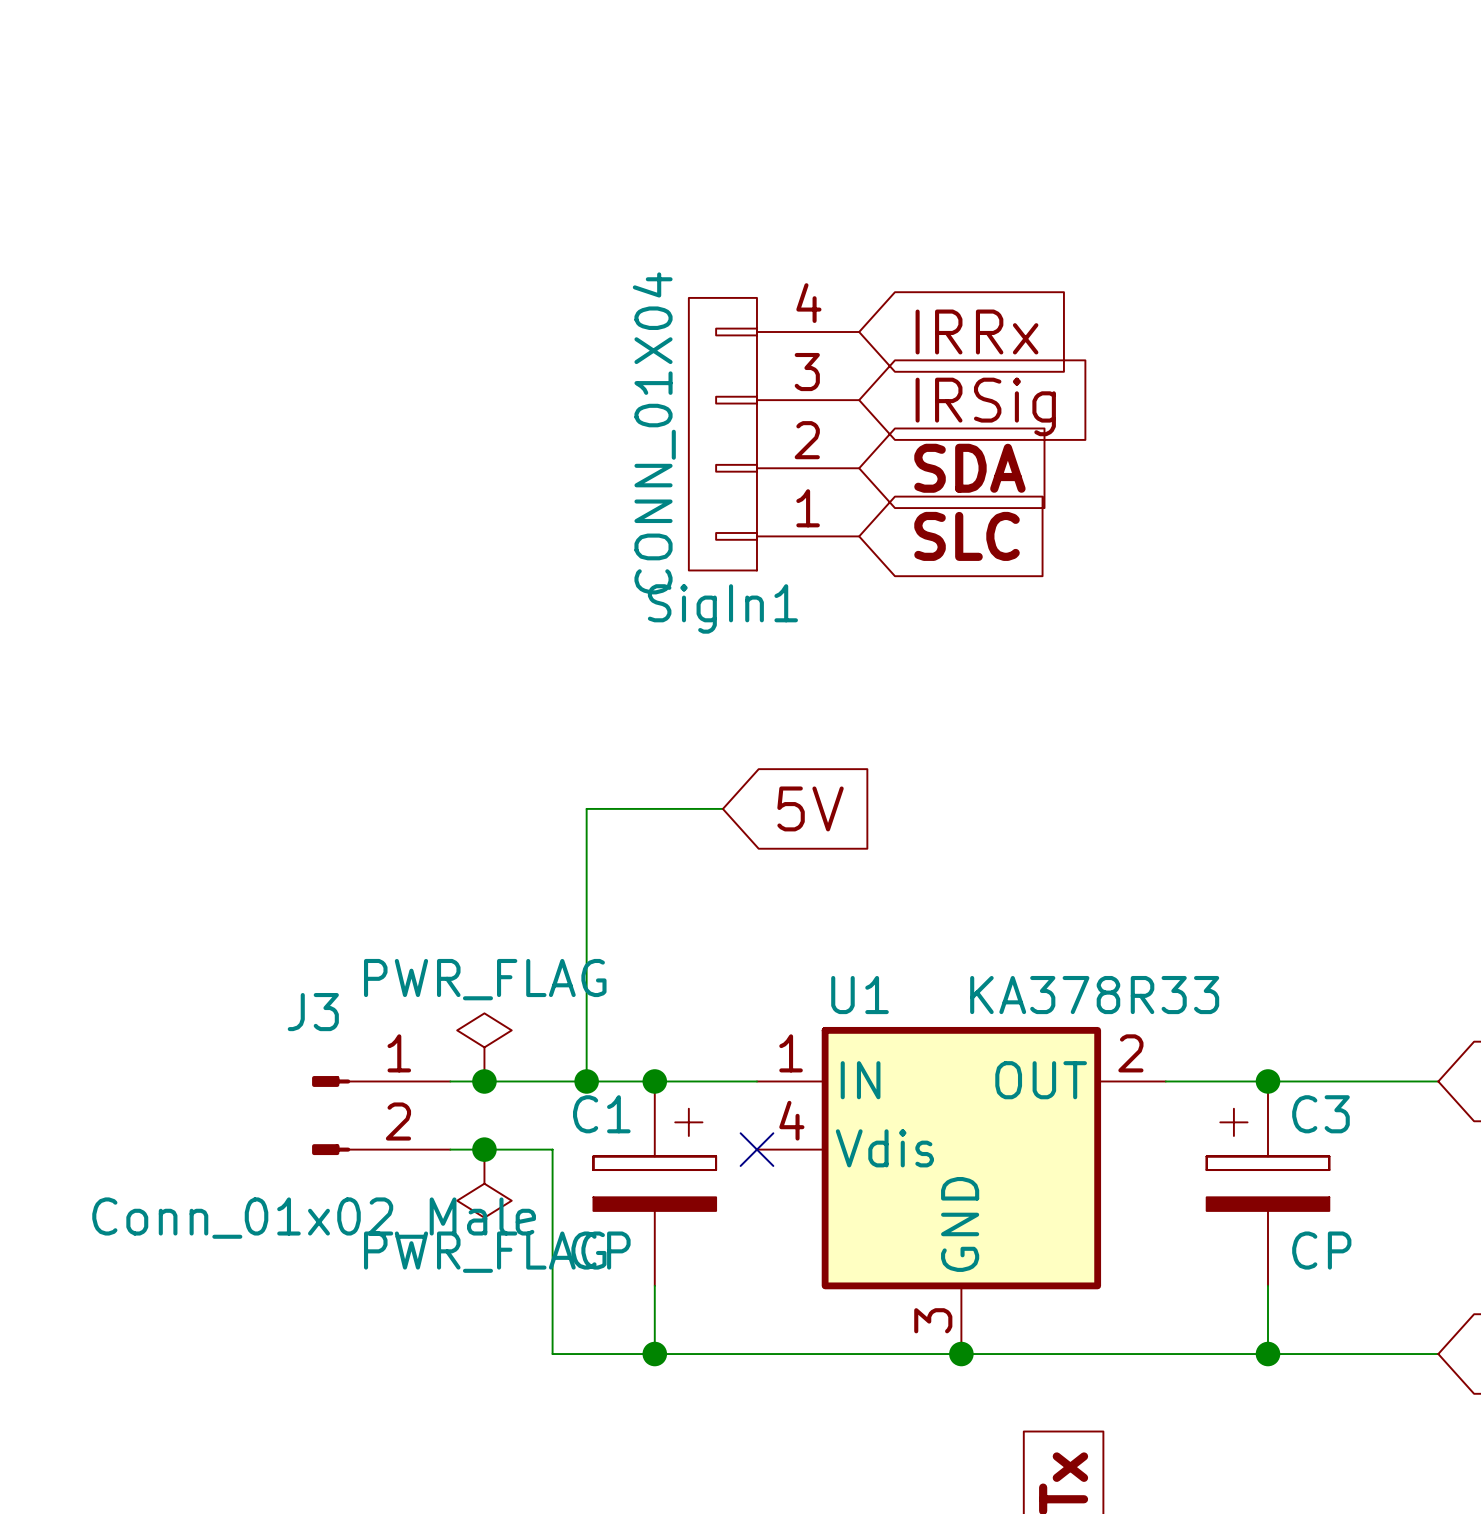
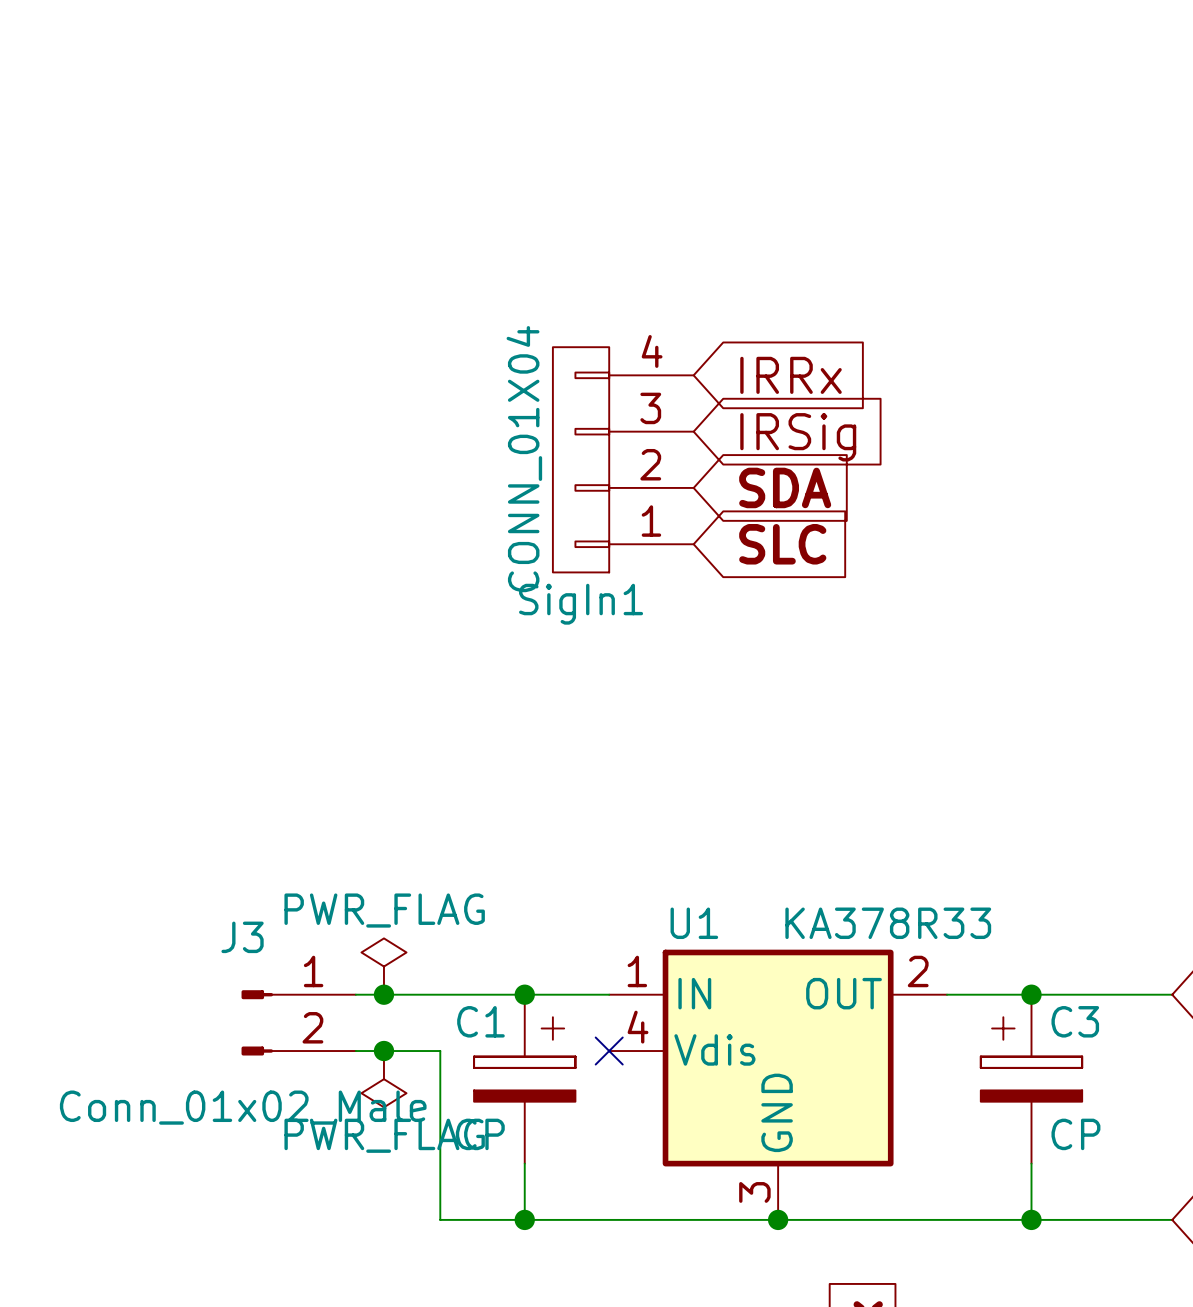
wire: (722, 808) (586, 808) (586, 1081) -> none
global label: 5V (810, 808) -> none
junction: (586, 1081) -> none

